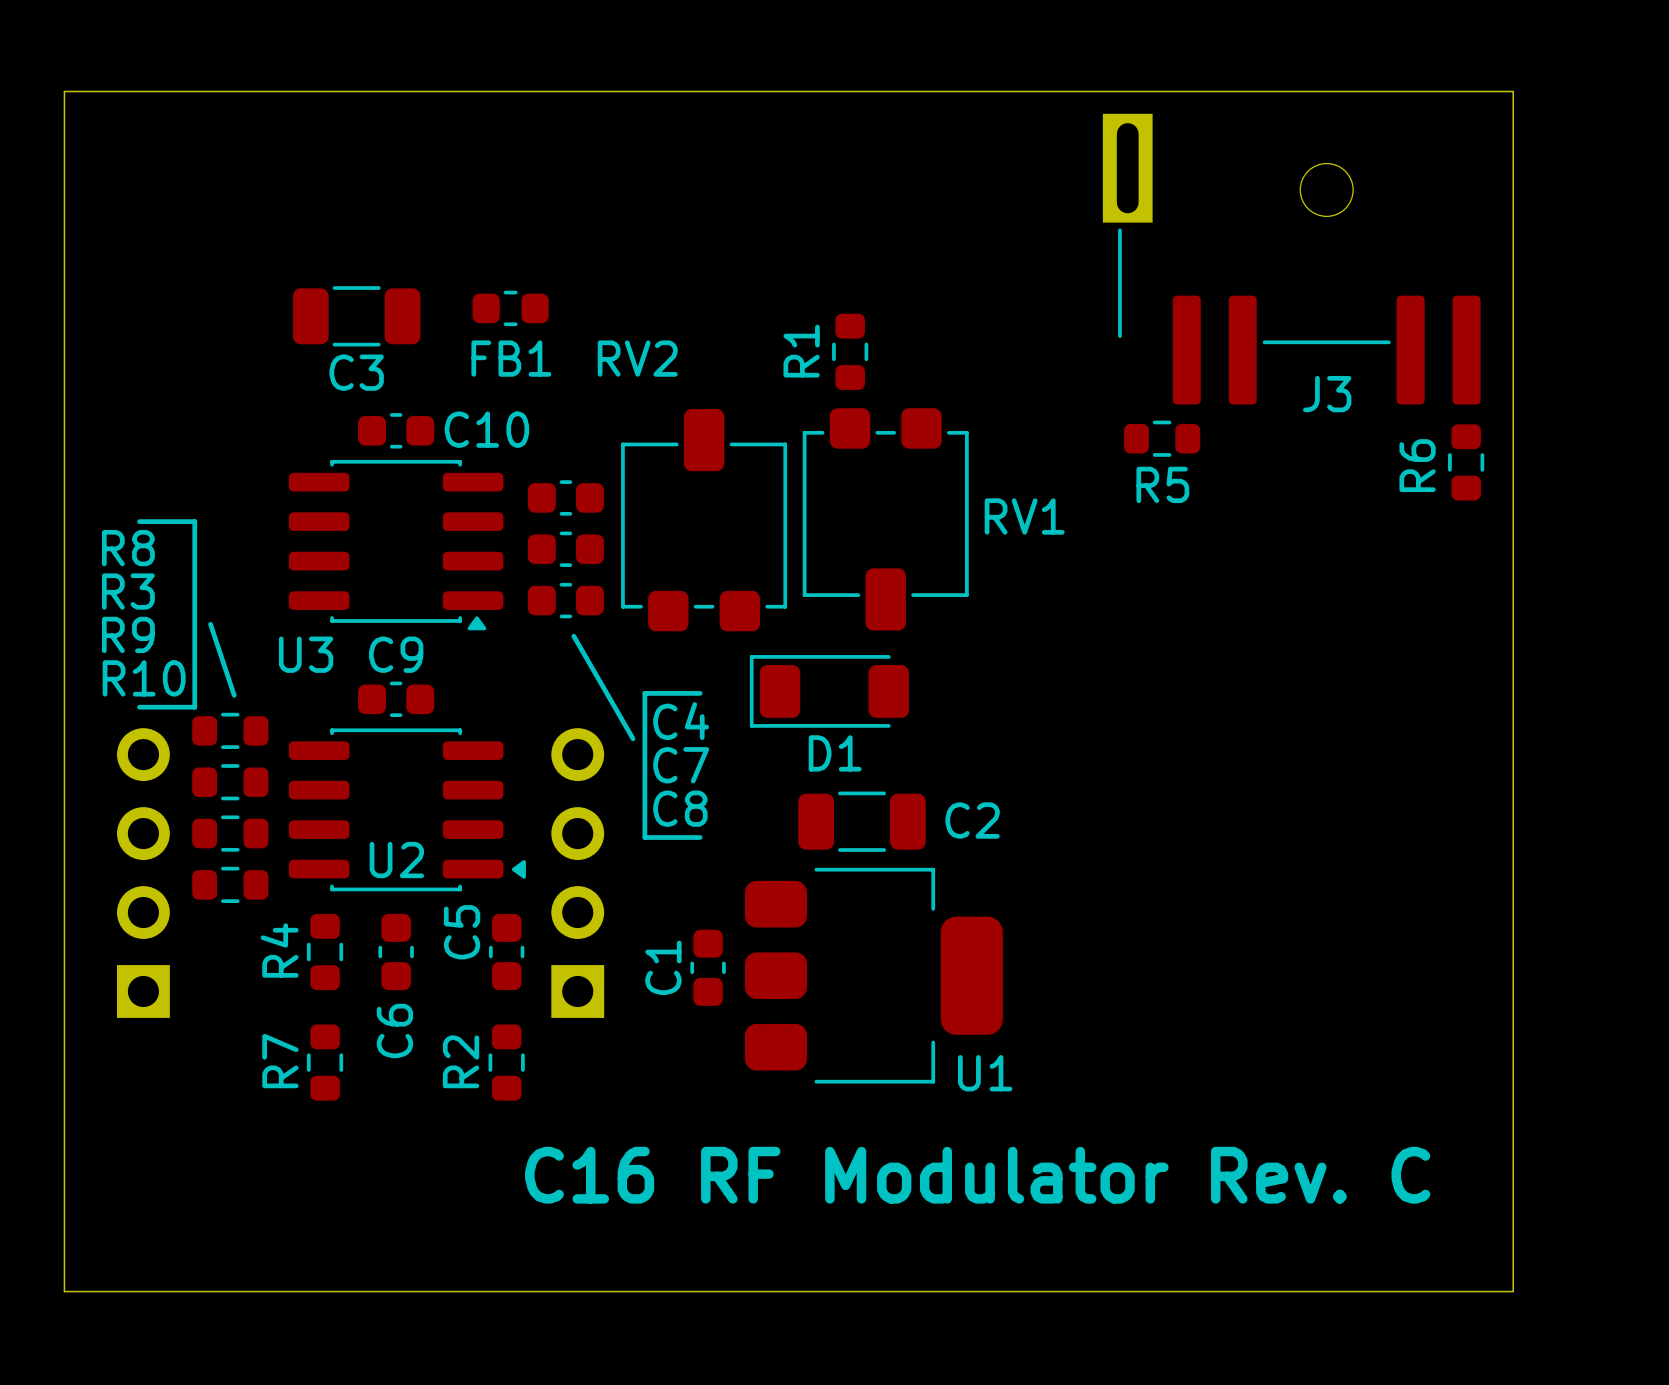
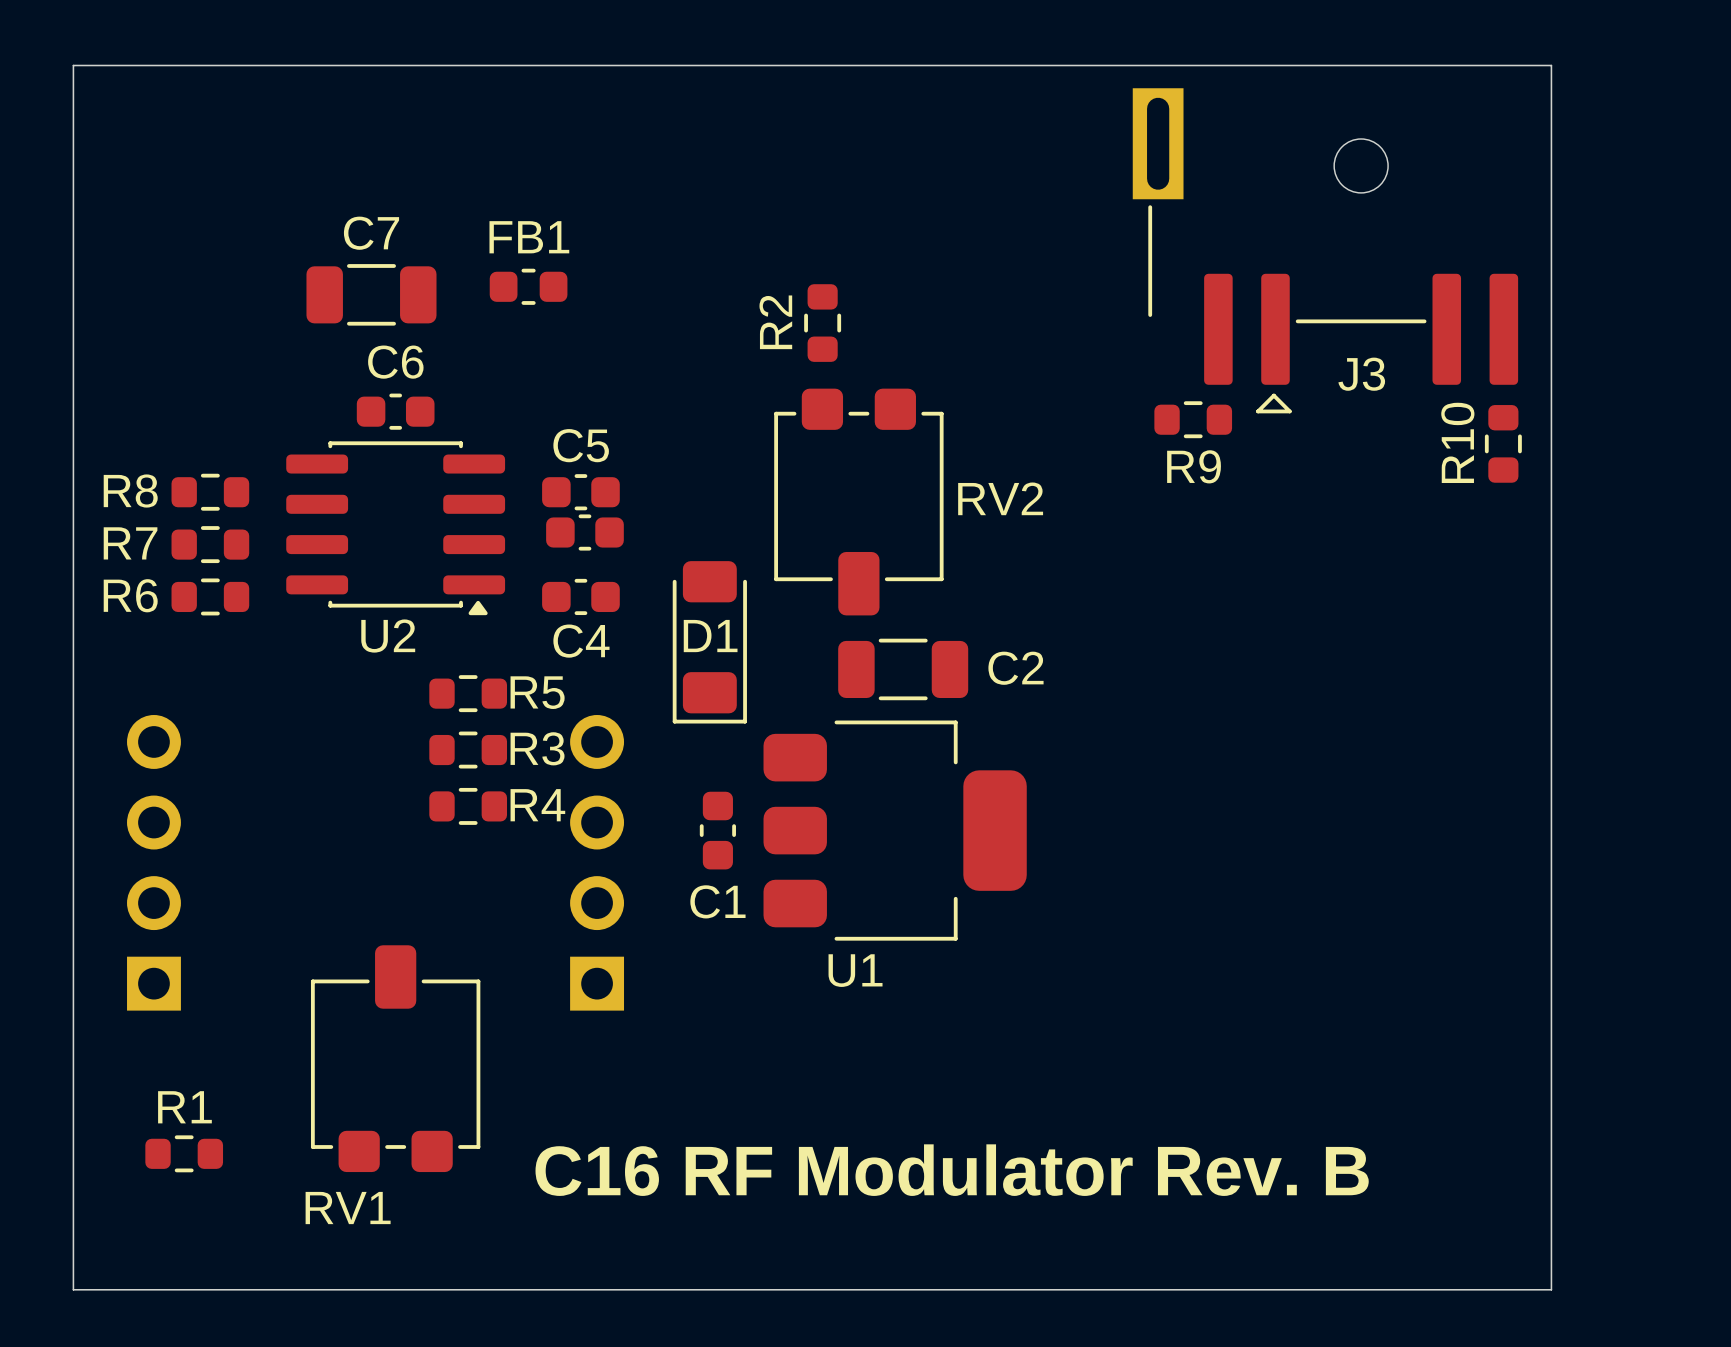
J3 footprint: [1102, 113, 1481, 405] -> [1132, 88, 1519, 414]
R1 rotation: 0° (850, 351) -> 90° clockwise (184, 1153)
R1 position: (850, 351) -> (184, 1153)
FB1 name position: FB1 (511, 358) -> FB1 (529, 237)
RV2 name position: RV2 (637, 358) -> RV2 (1000, 498)
C3 name: C3 (356, 372) -> C7 (371, 233)
C10: (396, 430) -> none
R6 name: R6 (1417, 465) -> R10 (1457, 442)
R5 name: R5 (1162, 484) -> R9 (1194, 466)
C4 position: (565, 497) -> (580, 596)
RV1 name position: RV1 (1024, 516) -> RV1 (348, 1208)
RV1 rotation: 0° (885, 519) -> 180° (395, 1058)
RV1 position: (885, 519) -> (395, 1058)
RV2 rotation: 0° (704, 520) -> 180° (858, 502)
line: (139, 521) (194, 521) (194, 707) (139, 707) -> none
U3: (396, 545) -> none
R8 name position: R8 (128, 548) -> R8 (130, 491)
R3 name position: R3 (128, 591) -> R3 (537, 748)
C7: (565, 600) -> none
R6: none -> (210, 596)
line: (210, 624) (234, 695) -> none
line: (573, 636) (633, 738) -> none
D1 rotation: 0° (829, 691) -> 90° counterclockwise (709, 642)
D1 position: (829, 691) -> (709, 642)
line: (700, 693) (644, 693) (644, 837) (700, 837) -> none
C9: (396, 699) -> none
R5: none -> (468, 693)
C4 name position: C4 (681, 721) -> C4 (581, 641)
U2 footprint: [288, 728, 526, 892] -> [286, 441, 506, 616]
R8 position: (230, 730) -> (210, 492)
D1 name position: D1 (835, 753) -> D1 (710, 636)
R3 position: (230, 782) -> (468, 750)
C8 name: C8 (680, 808) -> none
C2 position: (862, 821) -> (903, 669)
R9: (230, 833) -> none
R10: (230, 884) -> none
R4 name position: R4 (279, 950) -> R4 (537, 805)
R4 rotation: 0° (325, 952) -> 90° clockwise (468, 806)
R4 position: (325, 952) -> (468, 806)
C6 rotation: 0° (396, 952) -> 90° clockwise (395, 411)
C6 position: (396, 952) -> (395, 411)
C5 rotation: 0° (506, 952) -> 90° clockwise (580, 492)
C5 position: (506, 952) -> (580, 492)
C1 name rotation: 0° (663, 967) -> 90° clockwise (717, 901)
C1 position: (708, 967) -> (717, 830)
U1 position: (873, 975) -> (895, 830)
C6 name position: C6 (394, 1030) -> C6 (395, 362)
R7 rotation: 0° (325, 1062) -> 90° clockwise (210, 544)
R7 position: (325, 1062) -> (210, 544)
R2 position: (506, 1062) -> (822, 323)
U1 name position: U1 (985, 1073) -> U1 (855, 970)
text: C16 RF Modulator Rev. C (977, 1175) -> C16 RF Modulator Rev. B (952, 1170)

